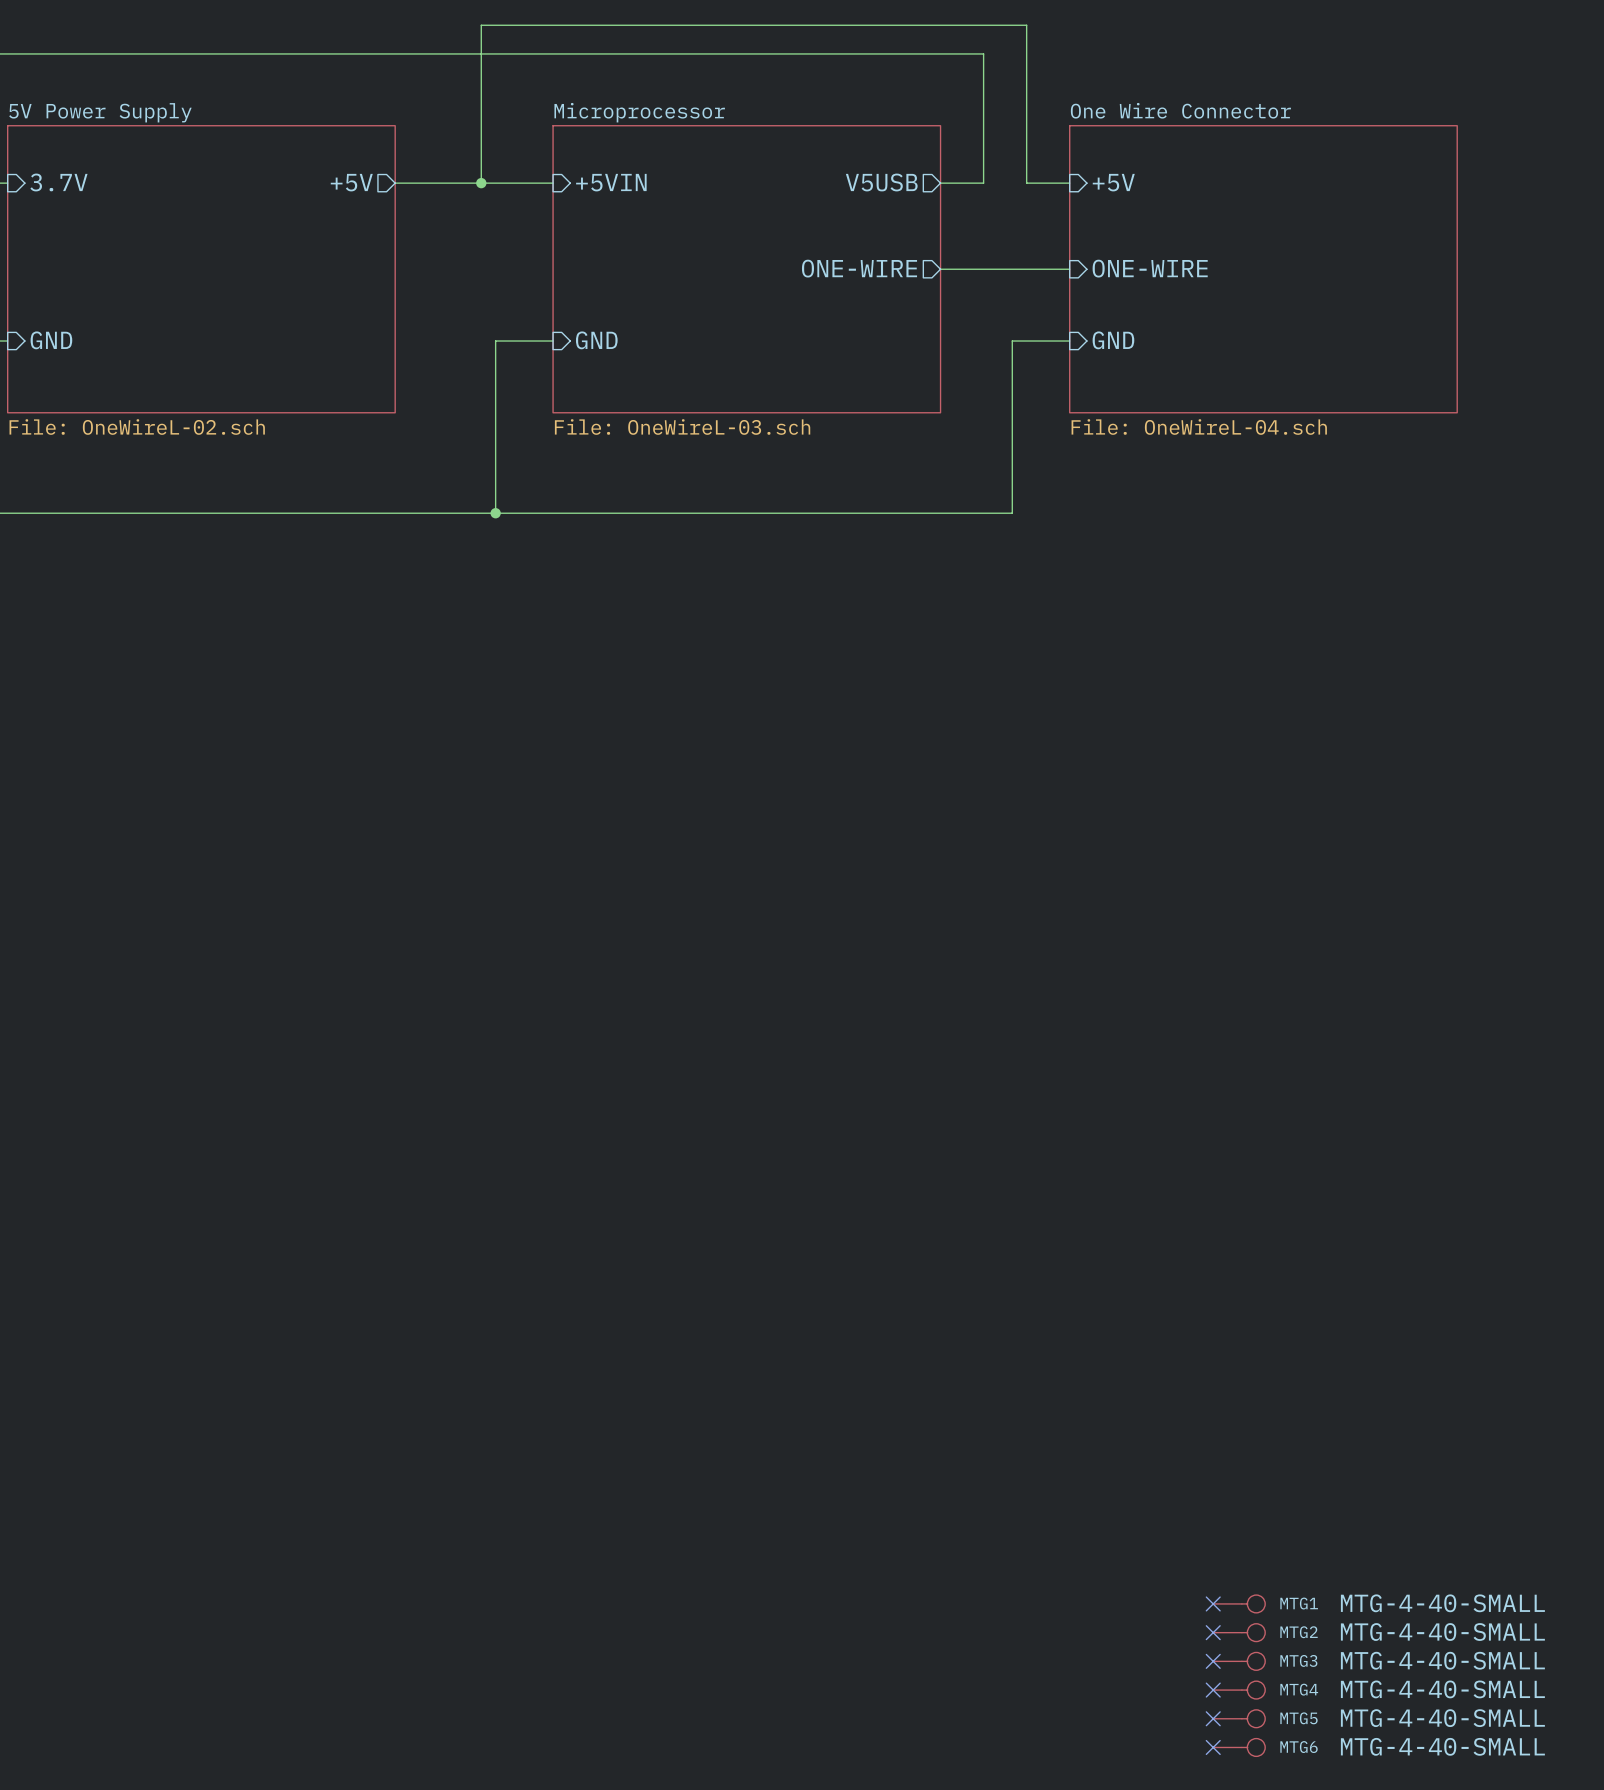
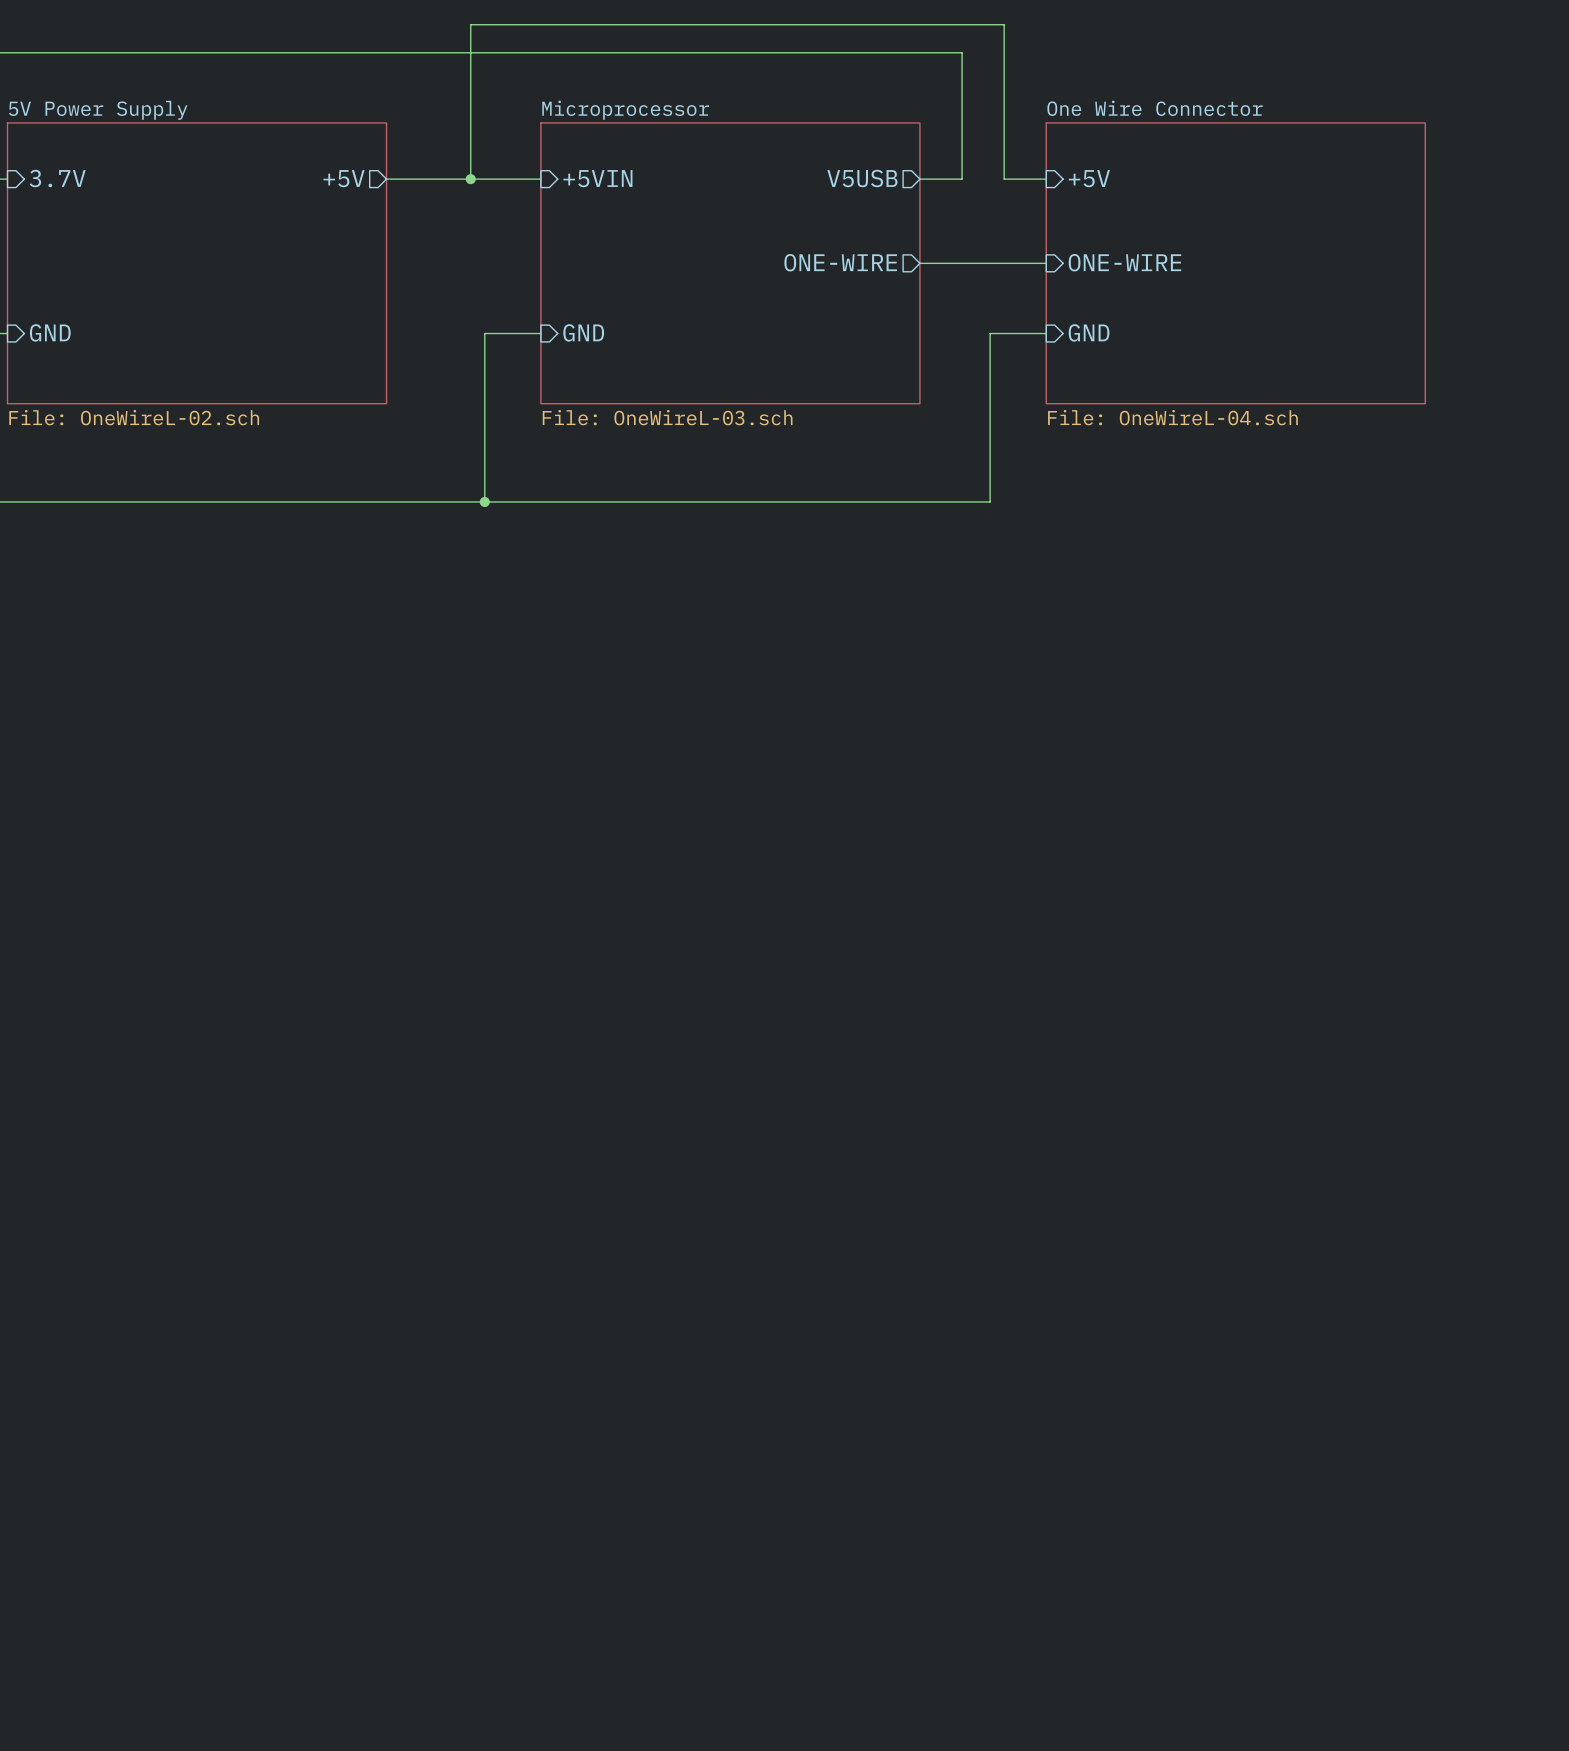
no-connect mark: (1213, 1603) -> none
MTG1: (1239, 1603) -> none
no-connect mark: (1213, 1632) -> none
MTG2: (1239, 1632) -> none
no-connect mark: (1213, 1661) -> none
MTG3: (1239, 1661) -> none
no-connect mark: (1213, 1690) -> none
MTG4: (1239, 1690) -> none
no-connect mark: (1213, 1718) -> none
MTG5: (1239, 1718) -> none
no-connect mark: (1213, 1747) -> none
MTG6: (1239, 1747) -> none

